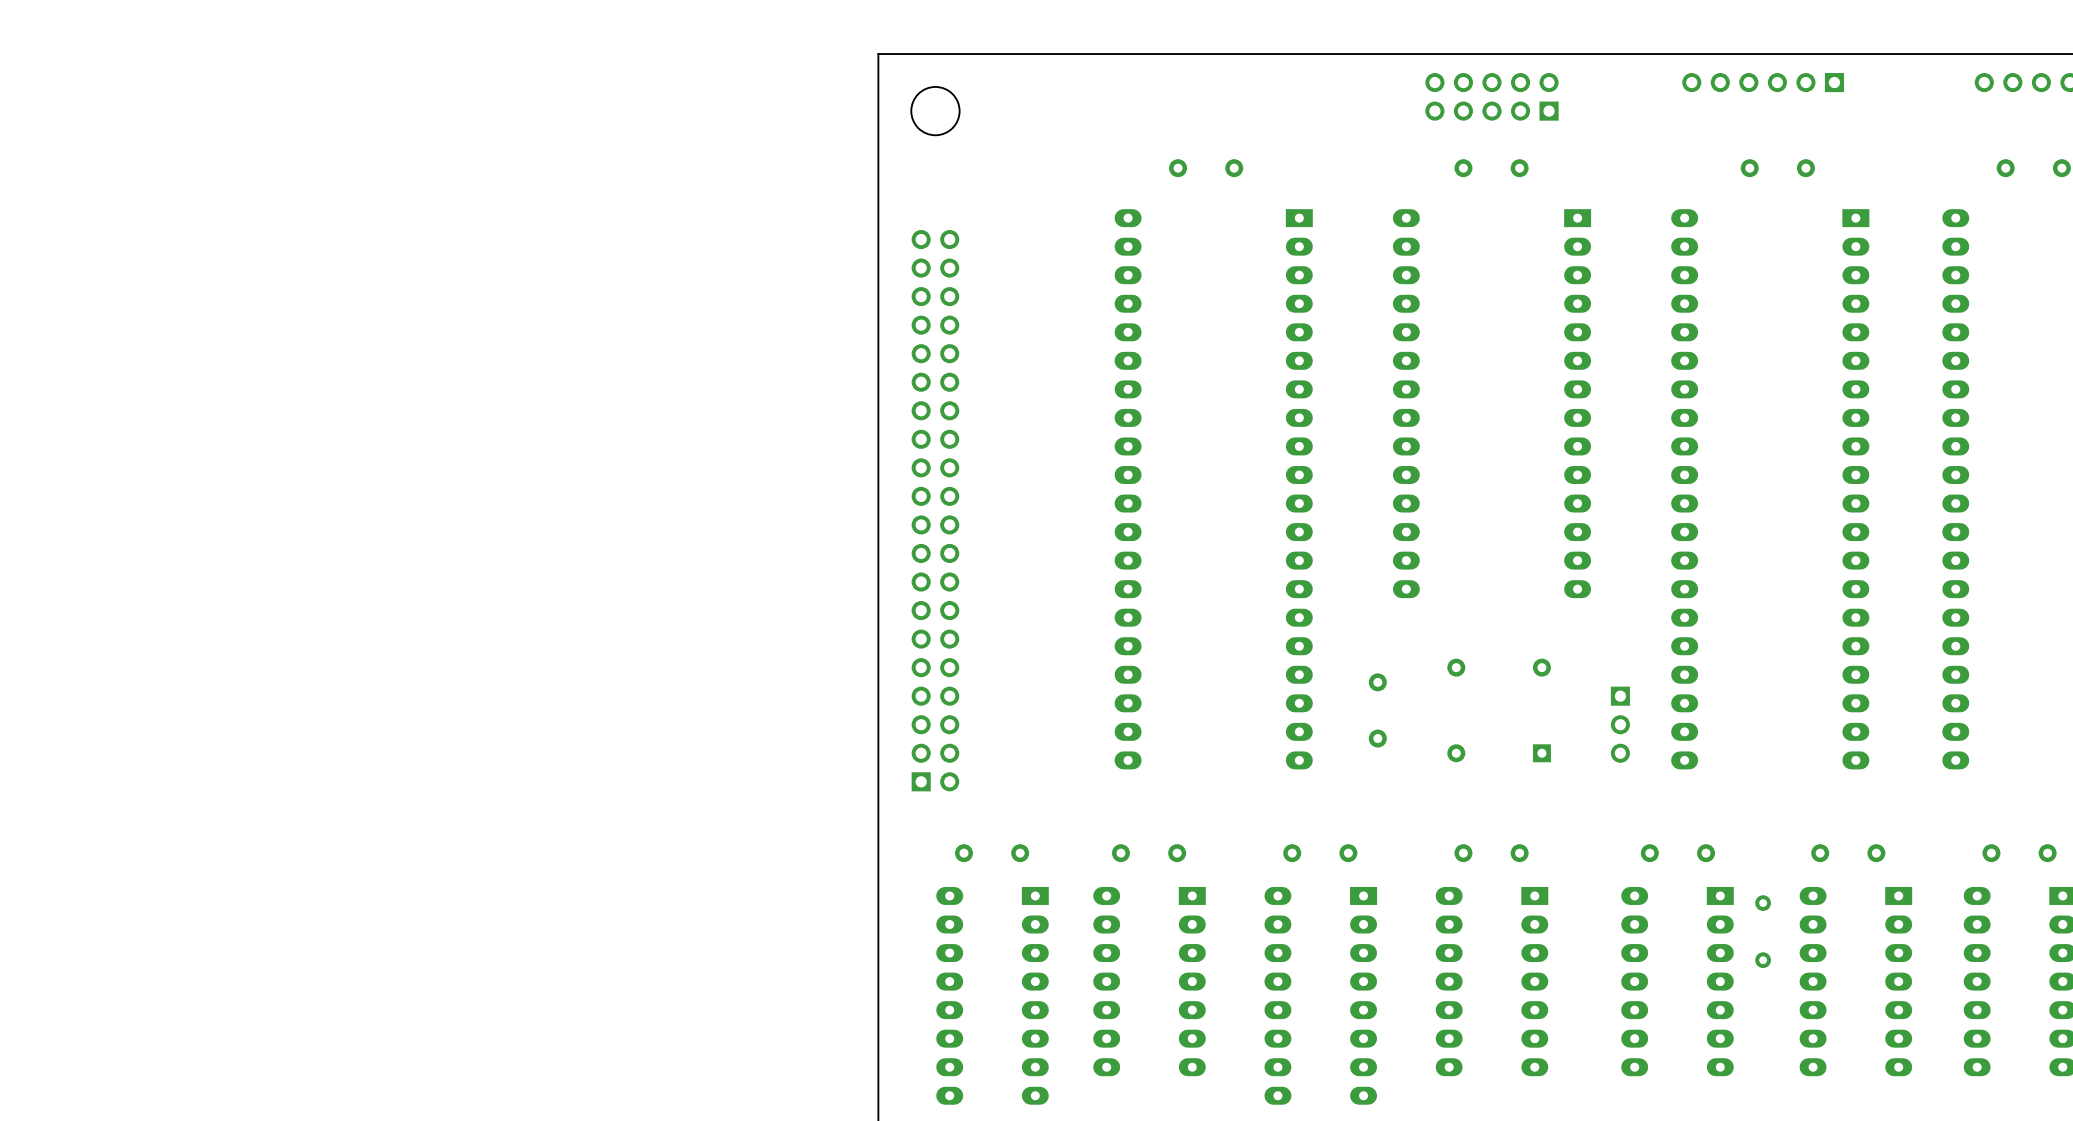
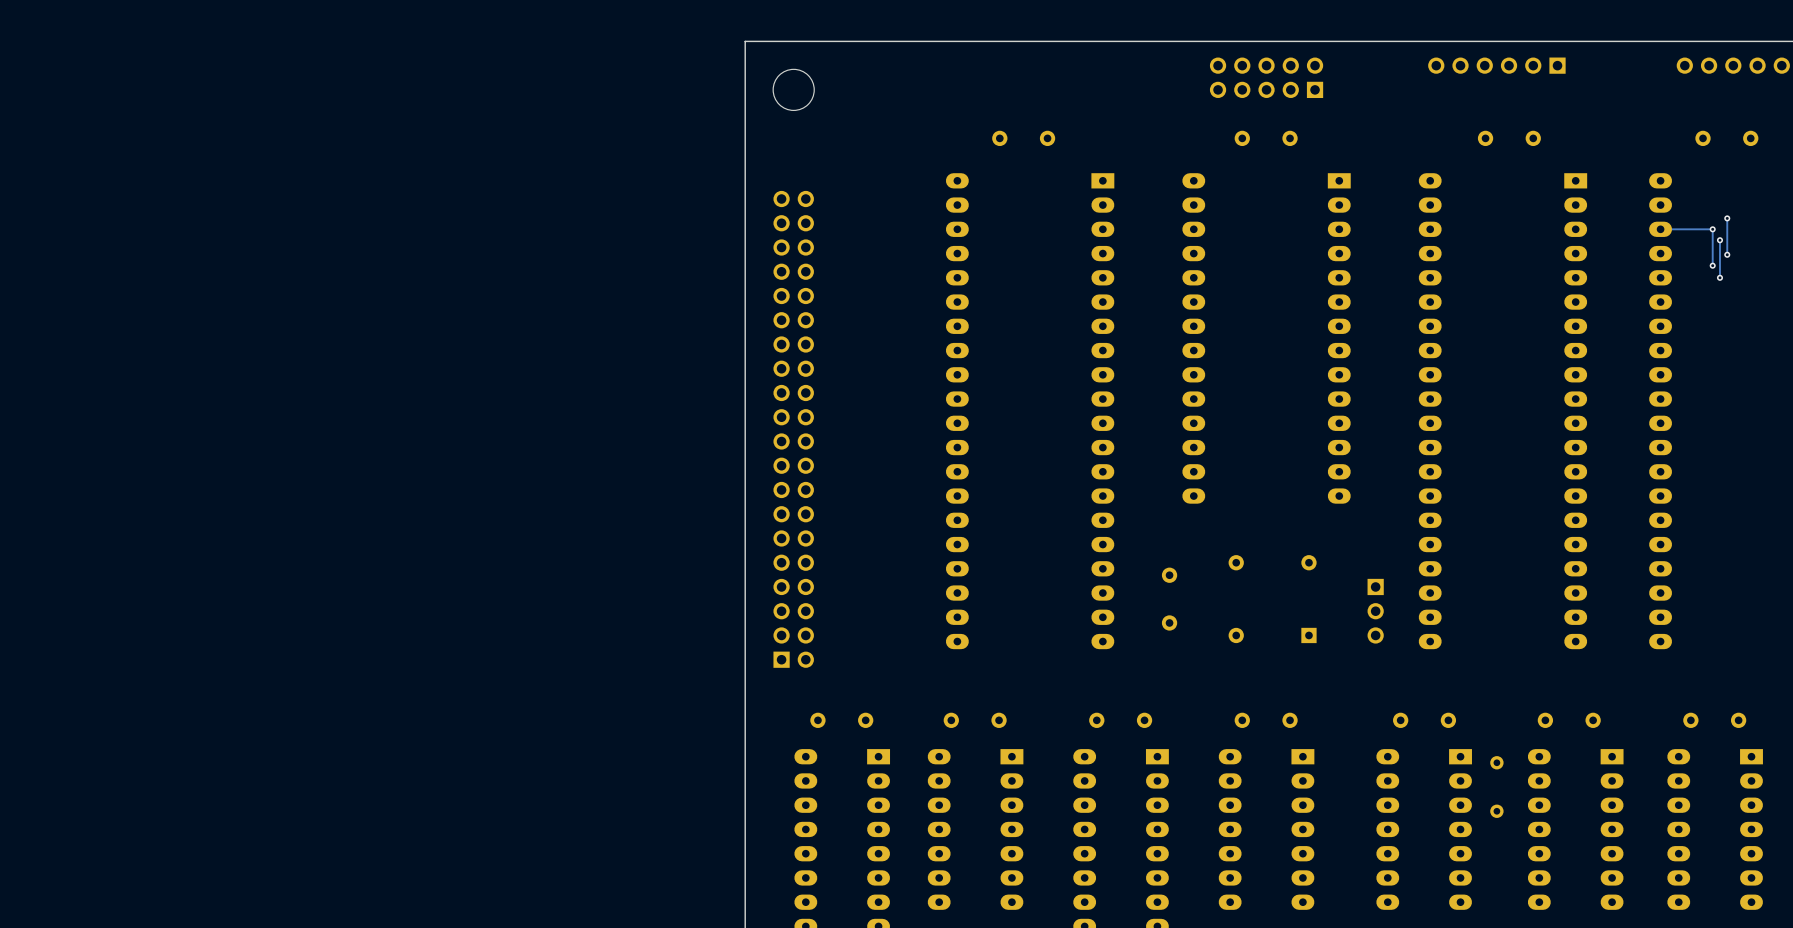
track: none -> (1727, 218) (1727, 254)
via: none -> (1727, 218)
track: none -> (1660, 229) (1712, 229) (1712, 265)
via: none -> (1712, 229)
track: none -> (1719, 240) (1719, 277)
via: none -> (1719, 240)
via: none -> (1727, 254)
via: none -> (1712, 265)
via: none -> (1719, 277)

